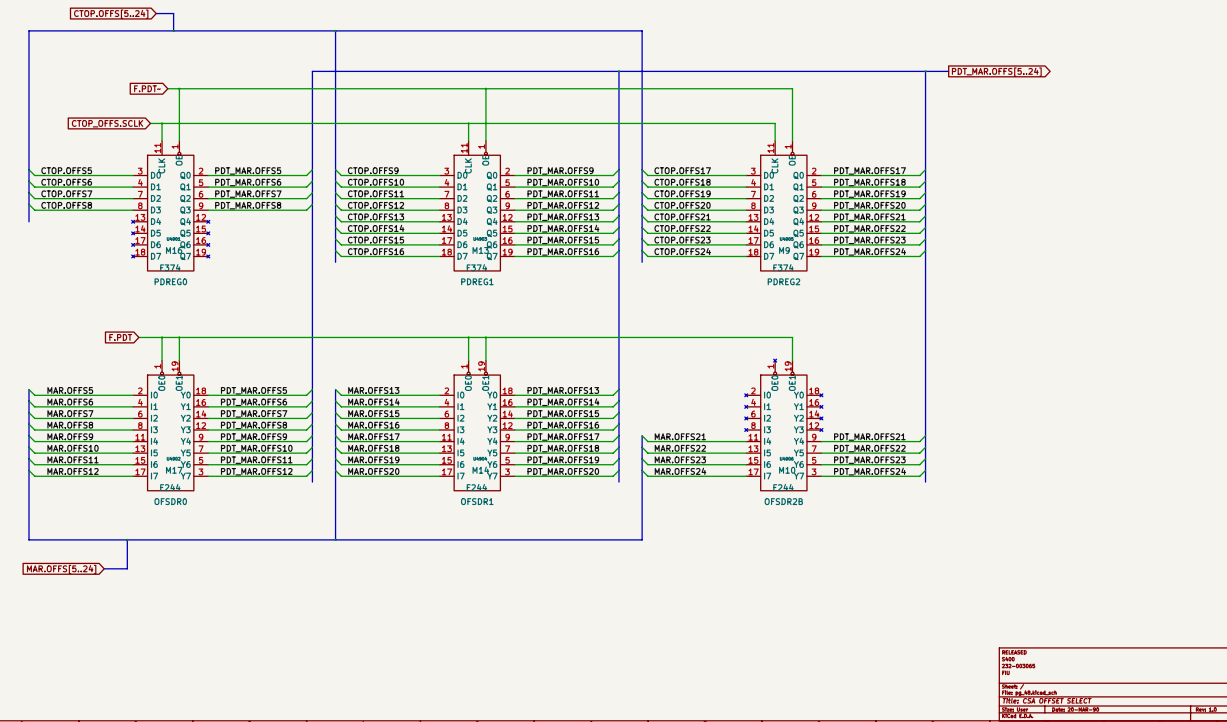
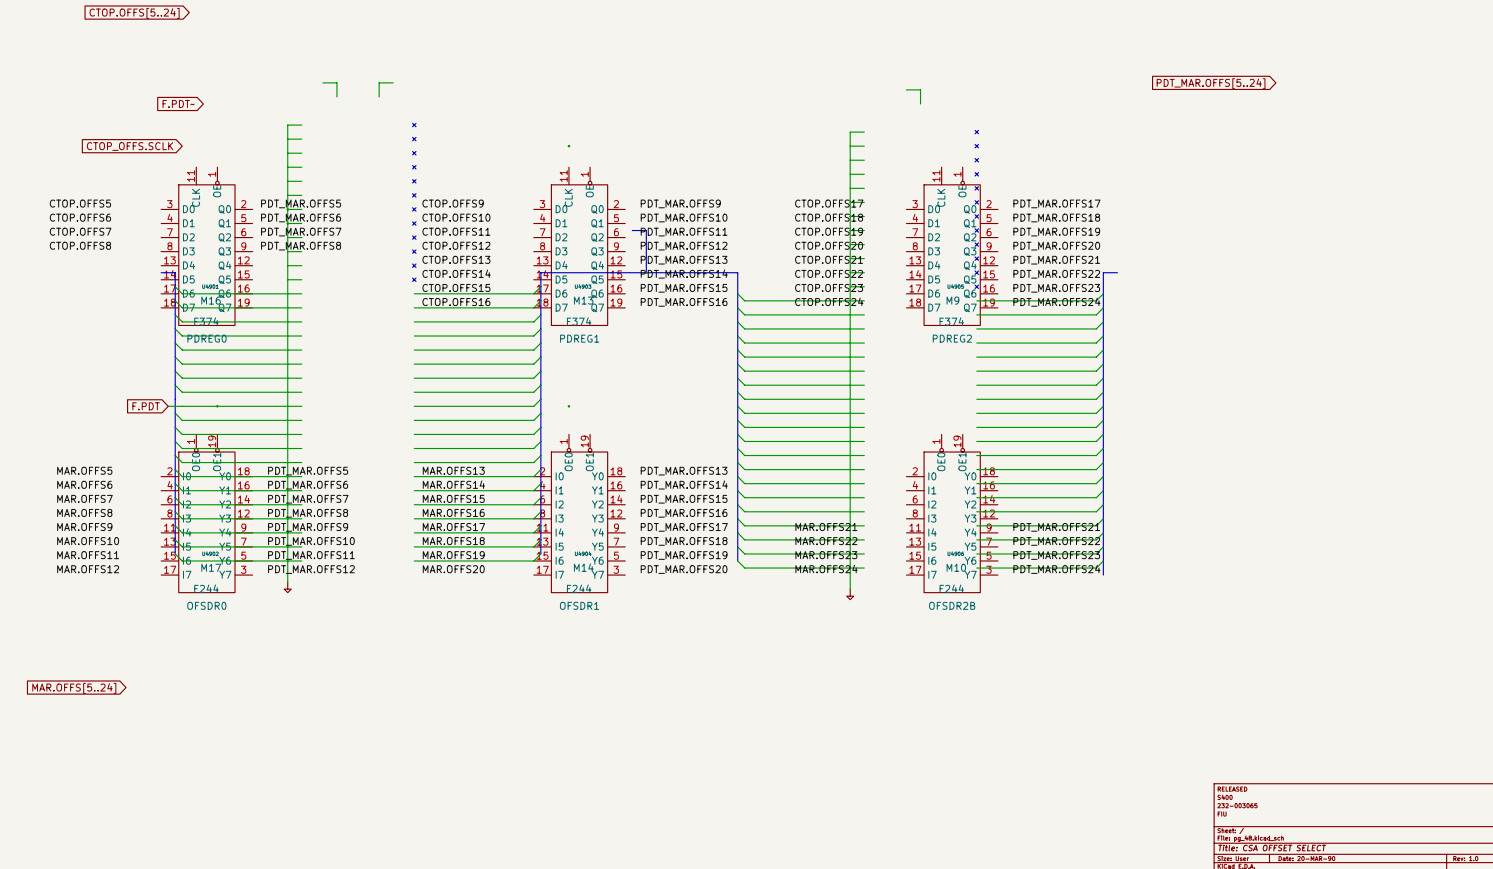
bus: (156, 13) (173, 13) (173, 30) -> none
junction: (173, 30) -> none
bus: (335, 30) (335, 262) -> none
junction: (335, 30) -> none
wire: none -> (322, 82) (336, 82) (336, 96)
bus: (618, 71) (618, 482) -> none
junction: (618, 71) -> none
bus: (925, 71) (925, 482) -> none
junction: (925, 71) -> none
bus: (948, 71) (312, 71) (312, 482) -> none
wire: none -> (906, 89) (920, 89) (920, 103)
wire: (167, 88) (792, 88) (792, 140) -> none
wire: (179, 88) (179, 140) -> none
wire: (485, 88) (485, 140) -> none
wire: none -> (301, 125) (287, 125) (287, 582)
no-connect mark: none -> (414, 125)
wire: none -> (864, 132) (850, 132) (850, 589)
no-connect mark: none -> (976, 132)
wire: none -> (287, 139) (301, 139)
no-connect mark: none -> (414, 139)
wire: (150, 123) (699, 123) -> none
wire: (162, 123) (162, 140) -> none
wire: (468, 123) (468, 140) -> none
wire: (711, 123) (775, 123) (775, 140) -> none
no-connect mark: none -> (976, 146)
wire: none -> (287, 153) (301, 153)
no-connect mark: none -> (414, 153)
wire: none -> (850, 160) (864, 160)
no-connect mark: none -> (976, 160)
wire: none -> (287, 167) (301, 167)
no-connect mark: none -> (414, 167)
wire: none -> (850, 174) (864, 174)
no-connect mark: none -> (976, 174)
wire: none -> (287, 181) (301, 181)
no-connect mark: none -> (414, 181)
wire: none -> (850, 188) (864, 188)
no-connect mark: none -> (976, 188)
wire: none -> (287, 195) (301, 195)
no-connect mark: none -> (414, 195)
wire: (29, 169) (34, 175) (133, 175) -> none
wire: (312, 169) (306, 175) (248, 175) -> none
wire: (335, 169) (341, 175) (439, 175) -> none
wire: (618, 169) (613, 175) (514, 175) -> none
wire: (642, 169) (647, 175) (746, 175) -> none
wire: none -> (850, 202) (864, 202)
no-connect mark: none -> (976, 202)
wire: (925, 169) (919, 175) (821, 175) -> none
wire: (208, 175) (237, 175) -> none
no-connect mark: none -> (414, 209)
wire: (29, 181) (34, 187) (133, 187) -> none
wire: (312, 181) (306, 187) (248, 187) -> none
wire: (335, 181) (341, 187) (439, 187) -> none
wire: (618, 181) (613, 187) (514, 187) -> none
wire: (642, 181) (647, 187) (746, 187) -> none
wire: none -> (850, 216) (864, 216)
no-connect mark: none -> (976, 216)
wire: (925, 181) (919, 187) (821, 187) -> none
wire: (208, 187) (237, 187) -> none
no-connect mark: none -> (414, 223)
wire: (29, 192) (34, 198) (133, 198) -> none
wire: (312, 192) (306, 198) (248, 198) -> none
wire: (335, 192) (341, 198) (439, 198) -> none
bus: none -> (632, 230) (646, 230) (646, 272)
wire: (618, 192) (613, 198) (514, 198) -> none
wire: (642, 192) (647, 198) (746, 198) -> none
wire: none -> (850, 230) (864, 230)
no-connect mark: none -> (976, 230)
wire: (925, 192) (919, 198) (821, 198) -> (1103, 293) (1096, 300) (976, 300)
wire: (208, 198) (237, 198) -> none
no-connect mark: none -> (414, 237)
wire: (29, 204) (34, 210) (133, 210) -> none
wire: (312, 204) (306, 210) (248, 210) -> none
wire: (335, 204) (341, 210) (439, 210) -> none
wire: (618, 204) (613, 210) (514, 210) -> none
wire: (642, 204) (647, 210) (746, 210) -> none
wire: none -> (850, 244) (864, 244)
no-connect mark: none -> (976, 244)
wire: (925, 204) (919, 210) (821, 210) -> (1103, 307) (1096, 314) (976, 314)
wire: (208, 210) (237, 210) -> none
no-connect mark: none -> (414, 251)
wire: (335, 215) (341, 221) (439, 221) -> none
wire: (618, 215) (613, 221) (514, 221) -> none
wire: (642, 215) (647, 221) (746, 221) -> none
wire: none -> (850, 258) (864, 258)
no-connect mark: none -> (976, 258)
wire: (925, 215) (919, 221) (821, 221) -> (1103, 321) (1096, 328) (976, 328)
bus: (29, 221) (29, 30) (642, 30) (642, 262) -> none
no-connect mark: (133, 221) -> none
no-connect mark: (208, 221) -> none
wire: none -> (287, 265) (301, 265)
no-connect mark: none -> (414, 265)
bus: none -> (161, 272) (175, 272) (175, 553)
wire: (335, 227) (341, 233) (439, 233) -> none
junction: none -> (646, 272)
wire: (618, 227) (613, 233) (514, 233) -> none
wire: (642, 227) (647, 233) (746, 233) -> (737, 321) (744, 328) (864, 328)
wire: none -> (850, 272) (864, 272)
no-connect mark: none -> (976, 272)
bus: none -> (1117, 272) (1103, 272) (1103, 575)
wire: (925, 227) (919, 233) (821, 233) -> (1103, 336) (1096, 343) (976, 343)
no-connect mark: (133, 233) -> none
no-connect mark: (208, 233) -> none
wire: none -> (287, 279) (301, 279)
no-connect mark: none -> (414, 279)
wire: none -> (175, 286) (182, 293) (301, 293)
wire: (335, 239) (341, 244) -> none
wire: none -> (540, 286) (533, 293)
wire: (618, 239) (613, 244) (514, 244) -> none
wire: (642, 239) (647, 244) (746, 244) -> (737, 293) (744, 300) (864, 300)
wire: none -> (850, 286) (864, 286)
no-connect mark: none -> (976, 286)
wire: (925, 239) (919, 244) (821, 244) -> (1103, 350) (1096, 357) (976, 357)
no-connect mark: (133, 244) -> none
no-connect mark: (208, 244) -> none
wire: none -> (175, 300) (182, 307) (301, 307)
wire: (335, 250) (341, 256) -> none
wire: none -> (540, 300) (533, 307)
wire: (618, 250) (613, 256) (514, 256) -> none
wire: (642, 250) (647, 256) (746, 256) -> (737, 307) (744, 314) (864, 314)
wire: (925, 250) (919, 256) (821, 256) -> (1103, 364) (1096, 371) (976, 371)
no-connect mark: (133, 256) -> none
no-connect mark: (208, 256) -> none
wire: none -> (175, 314) (182, 321) (301, 321)
wire: none -> (540, 314) (533, 321) (414, 321)
wire: none -> (175, 328) (182, 336) (301, 336)
wire: none -> (540, 328) (533, 336) (414, 336)
wire: none -> (737, 336) (744, 343) (864, 343)
wire: none -> (175, 343) (182, 350) (301, 350)
wire: none -> (540, 343) (533, 350) (414, 350)
wire: none -> (737, 350) (744, 357) (864, 357)
wire: none -> (175, 357) (182, 364) (301, 364)
wire: none -> (540, 357) (533, 364) (414, 364)
wire: none -> (737, 364) (744, 371) (864, 371)
wire: none -> (175, 371) (182, 378) (301, 378)
wire: none -> (540, 371) (533, 378) (414, 378)
wire: none -> (737, 378) (744, 385) (864, 385)
wire: none -> (1103, 378) (1096, 385) (976, 385)
wire: none -> (175, 385) (182, 392) (301, 392)
wire: none -> (540, 385) (533, 392) (414, 392)
wire: none -> (737, 392) (744, 399) (864, 399)
wire: none -> (1103, 392) (1096, 399) (976, 399)
wire: (162, 337) (162, 360) -> none
wire: (179, 337) (179, 360) -> none
wire: (248, 337) (341, 337) -> none
wire: (439, 337) (792, 337) (792, 360) -> (533, 406) (540, 399)
wire: (468, 337) (468, 360) -> none
wire: (485, 337) (485, 360) -> none
wire: none -> (737, 406) (744, 413) (864, 413)
wire: none -> (1103, 406) (1096, 413) (976, 413)
wire: none -> (175, 413) (182, 420) (301, 420)
wire: none -> (540, 413) (533, 420) (414, 420)
wire: none -> (737, 420) (744, 427) (864, 427)
wire: none -> (1103, 420) (1096, 427) (976, 427)
wire: none -> (175, 427) (182, 434) (301, 434)
wire: none -> (540, 427) (533, 434) (414, 434)
wire: none -> (737, 434) (744, 441) (864, 441)
no-connect mark: (775, 360) -> none
wire: none -> (1103, 434) (1096, 441) (976, 441)
wire: none -> (175, 441) (182, 448) (301, 448)
wire: none -> (540, 441) (533, 448) (414, 448)
wire: none -> (737, 448) (744, 455) (864, 455)
wire: none -> (1103, 448) (1096, 455) (976, 455)
wire: none -> (175, 455) (182, 462) (301, 462)
wire: none -> (540, 455) (533, 462) (414, 462)
wire: none -> (737, 462) (744, 469) (864, 469)
wire: none -> (1103, 462) (1096, 469) (976, 469)
bus: (29, 389) (29, 539) (642, 539) (642, 435) -> none
wire: (29, 389) (34, 395) (133, 395) -> none
wire: none -> (175, 469) (182, 476) (252, 476)
wire: (312, 389) (306, 395) (248, 395) -> none
bus: (335, 389) (335, 539) -> none
wire: (335, 389) (341, 395) -> none
wire: none -> (540, 469) (533, 476)
wire: (618, 389) (613, 395) (514, 395) -> none
wire: none -> (737, 476) (744, 483) (864, 483)
no-connect mark: (746, 395) -> none
no-connect mark: (821, 395) -> none
wire: none -> (1103, 476) (1096, 483) (976, 483)
wire: (29, 401) (34, 406) (133, 406) -> none
wire: none -> (175, 483) (182, 490) (252, 490)
wire: (312, 401) (306, 406) (248, 406) -> none
wire: (335, 401) (341, 406) -> none
wire: none -> (540, 483) (533, 490)
wire: (618, 401) (613, 406) (514, 406) -> none
wire: none -> (737, 490) (744, 497) (864, 497)
no-connect mark: (746, 406) -> none
no-connect mark: (821, 406) -> none
wire: none -> (1103, 490) (1096, 497) (976, 497)
wire: (29, 412) (34, 418) (133, 418) -> none
wire: none -> (175, 497) (182, 504) (252, 504)
wire: (312, 412) (306, 418) (248, 418) -> none
wire: (335, 412) (341, 418) -> none
wire: none -> (540, 497) (533, 504)
wire: (618, 412) (613, 418) (514, 418) -> none
wire: none -> (737, 504) (744, 511) (864, 511)
no-connect mark: (746, 418) -> none
no-connect mark: (821, 418) -> none
wire: none -> (1103, 504) (1096, 511) (976, 511)
wire: (29, 424) (34, 430) (133, 430) -> none
wire: none -> (175, 511) (182, 518) (252, 518)
wire: (312, 424) (306, 430) (248, 430) -> none
wire: (335, 424) (341, 430) -> none
wire: none -> (540, 511) (533, 518)
wire: (618, 424) (613, 430) (514, 430) -> none
no-connect mark: (746, 430) -> none
no-connect mark: (821, 430) -> none
wire: (29, 435) (34, 441) (133, 441) -> none
wire: none -> (175, 525) (182, 532) (252, 532)
wire: (312, 435) (306, 441) (248, 441) -> none
wire: (335, 435) (341, 441) -> none
wire: none -> (540, 525) (533, 532)
wire: (618, 435) (613, 441) (514, 441) -> none
wire: (642, 435) (647, 441) (746, 441) -> (737, 532) (744, 539) (864, 539)
wire: (925, 435) (919, 441) (821, 441) -> (1103, 532) (1096, 539) (976, 539)
wire: (29, 447) (34, 453) (133, 453) -> none
wire: none -> (175, 539) (182, 546) (252, 546)
wire: (312, 447) (306, 453) (248, 453) -> none
wire: (335, 447) (341, 453) -> none
wire: none -> (540, 539) (533, 546)
wire: (618, 447) (613, 453) (514, 453) -> none
wire: (642, 447) (647, 453) (746, 453) -> (737, 546) (744, 553) (864, 553)
wire: (925, 447) (919, 453) (821, 453) -> (1103, 546) (1096, 553) (976, 553)
wire: (29, 458) (34, 464) (133, 464) -> none
wire: none -> (175, 553) (182, 561) (252, 561)
wire: (312, 458) (306, 464) (248, 464) -> none
wire: (335, 458) (341, 464) -> none
bus: none -> (540, 553) (540, 272) (737, 272) (737, 561)
wire: none -> (540, 553) (533, 561)
wire: (618, 458) (613, 464) (514, 464) -> none
wire: (642, 458) (647, 464) (746, 464) -> (737, 518) (744, 525) (864, 525)
wire: (925, 458) (919, 464) (821, 464) -> (1103, 518) (1096, 525) (976, 525)
wire: (29, 470) (34, 476) (133, 476) -> none
wire: (312, 470) (306, 476) (208, 476) -> none
wire: (335, 470) (341, 476) (439, 476) -> none
wire: (618, 470) (613, 476) (514, 476) -> none
wire: (642, 470) (647, 476) (746, 476) -> (737, 561) (744, 568) (864, 568)
wire: (925, 470) (919, 476) (821, 476) -> (1103, 561) (1096, 568) (976, 568)
power symbol: none -> (287, 587)
power symbol: none -> (850, 594)
bus: (127, 539) (127, 568) (104, 568) -> none
junction: (127, 539) -> none
junction: (335, 539) -> none

